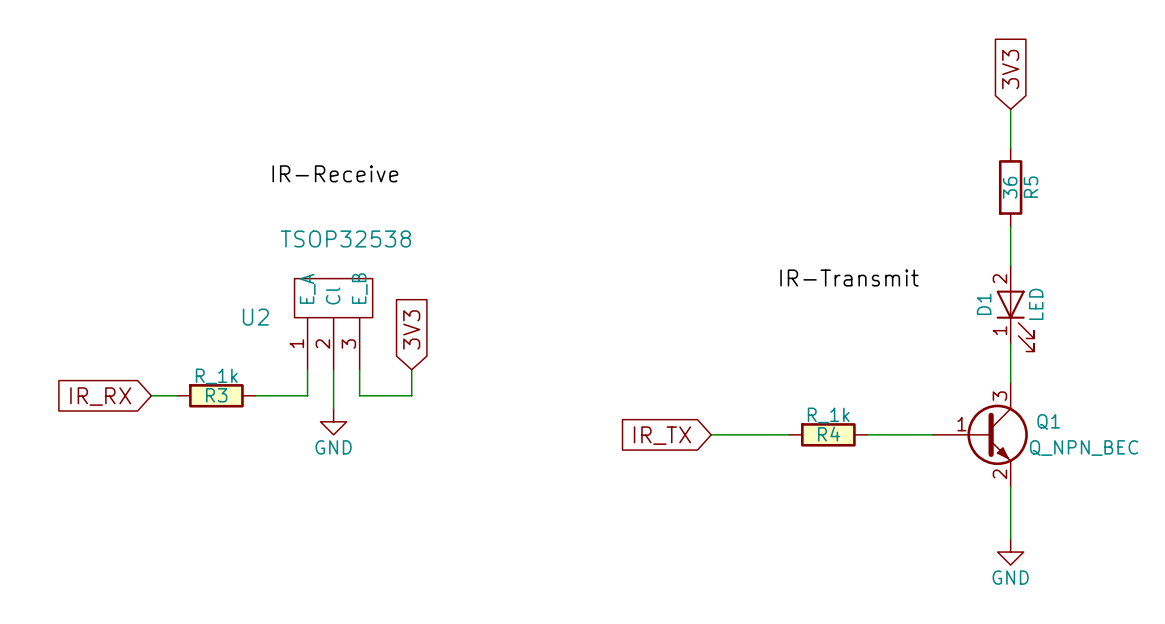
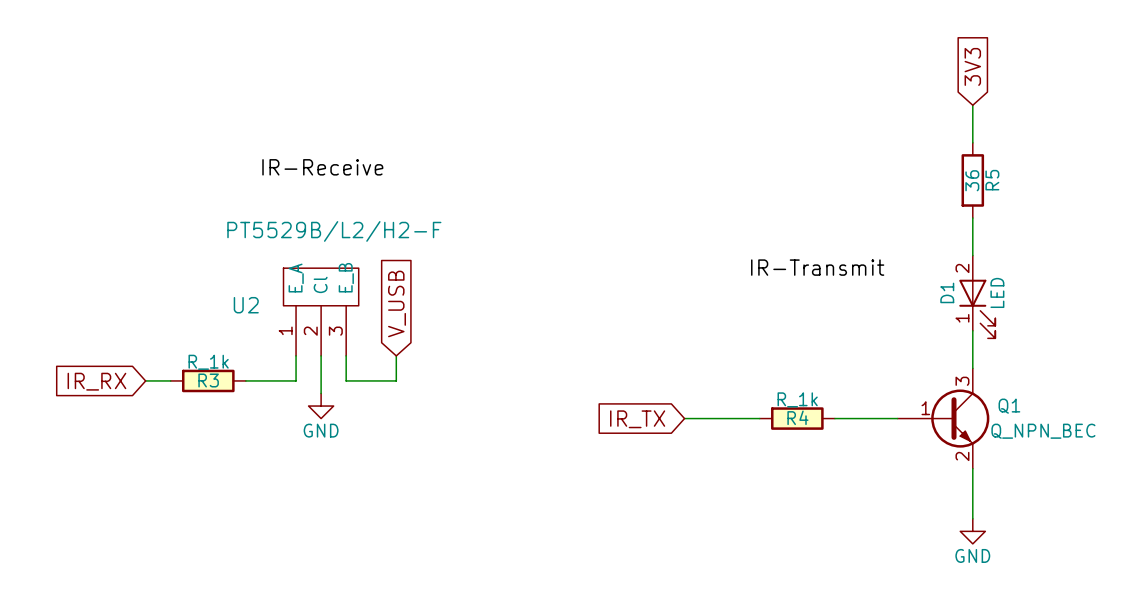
U2 value: TSOP32538 (345, 238) -> PT5529B/L2/H2-F (334, 231)
global label: 3V3 (411, 329) -> V_USB (397, 303)

